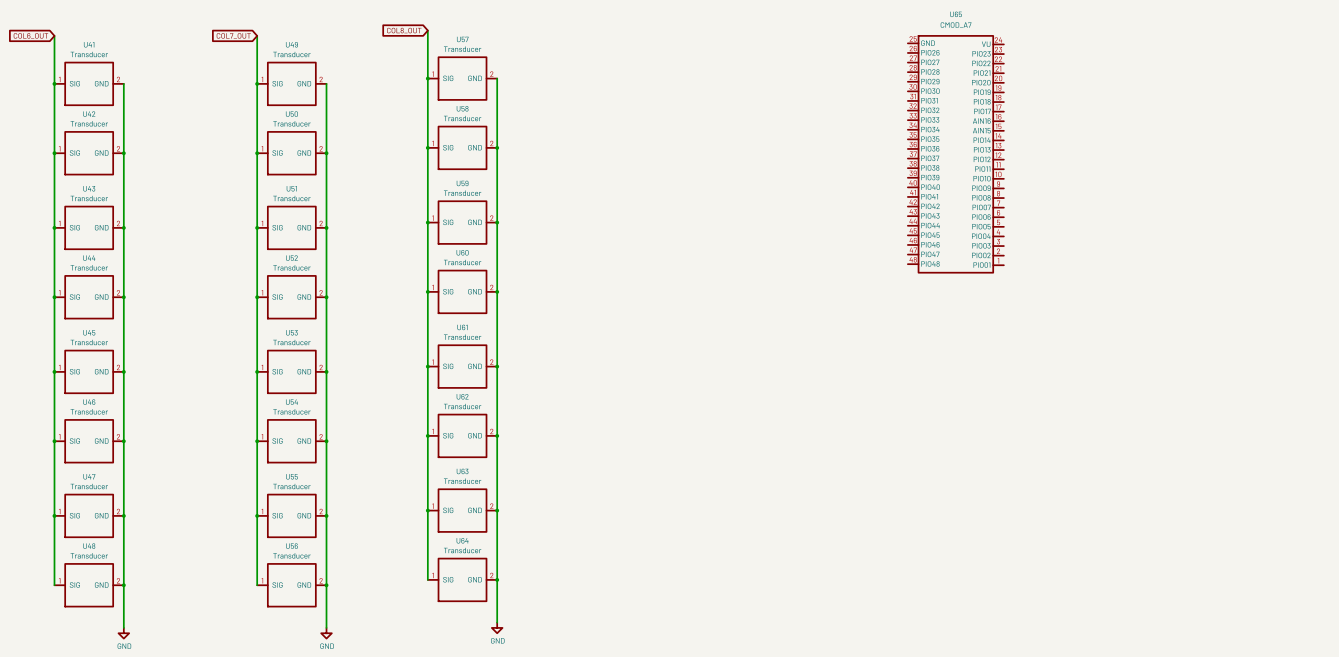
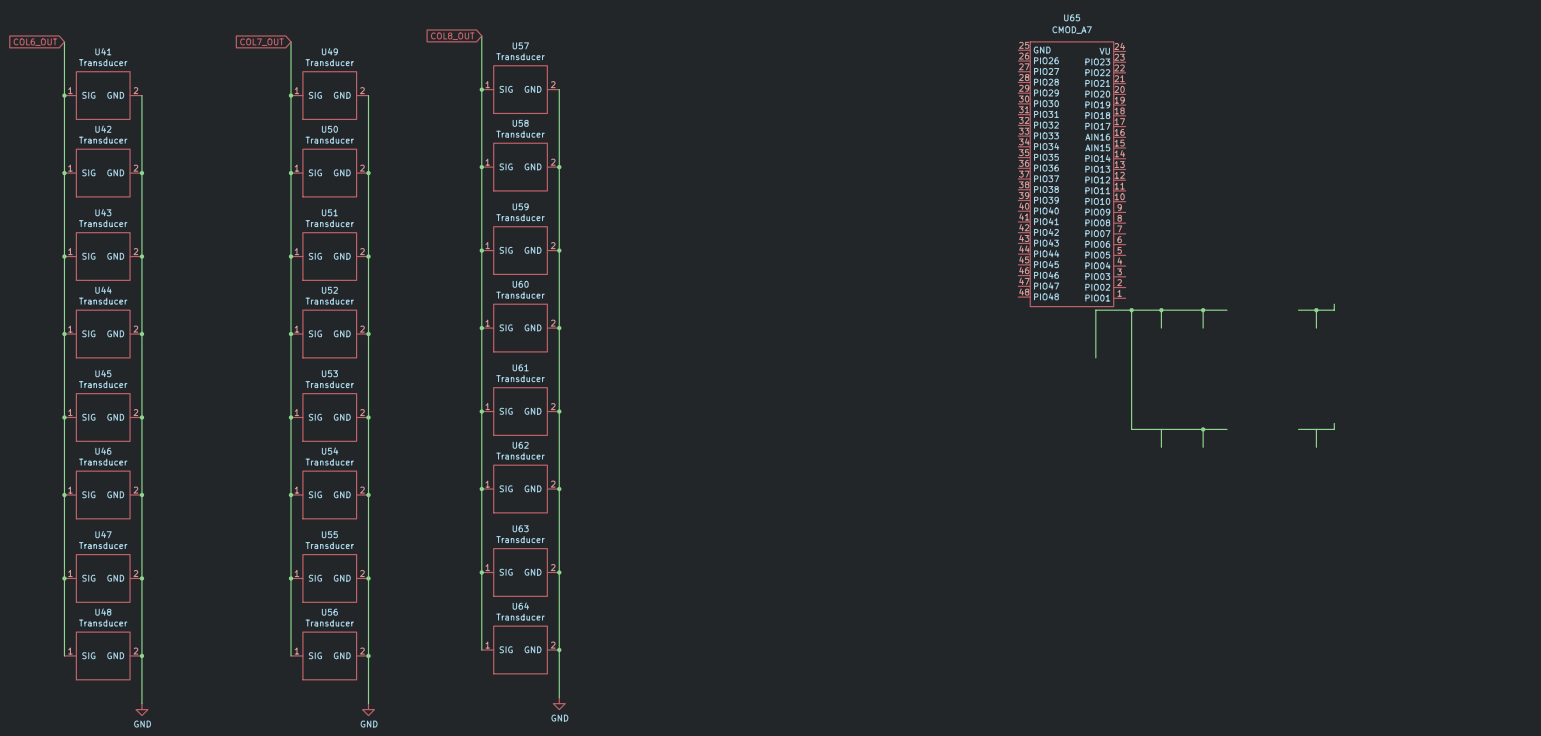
wire: none -> (1334, 304) (1334, 310) (1298, 310)
wire: none -> (1131, 310) (1131, 429) (1226, 429)
junction: none -> (1131, 310)
wire: none -> (1161, 310) (1161, 328)
junction: none -> (1161, 310)
wire: none -> (1203, 310) (1203, 328)
junction: none -> (1203, 310)
wire: none -> (1226, 310) (1095, 310) (1095, 357)
wire: none -> (1316, 310) (1316, 328)
junction: none -> (1316, 310)
wire: none -> (1334, 423) (1334, 429) (1298, 429)
wire: none -> (1161, 429) (1161, 447)
wire: none -> (1203, 429) (1203, 447)
junction: none -> (1203, 429)
wire: none -> (1316, 429) (1316, 447)

